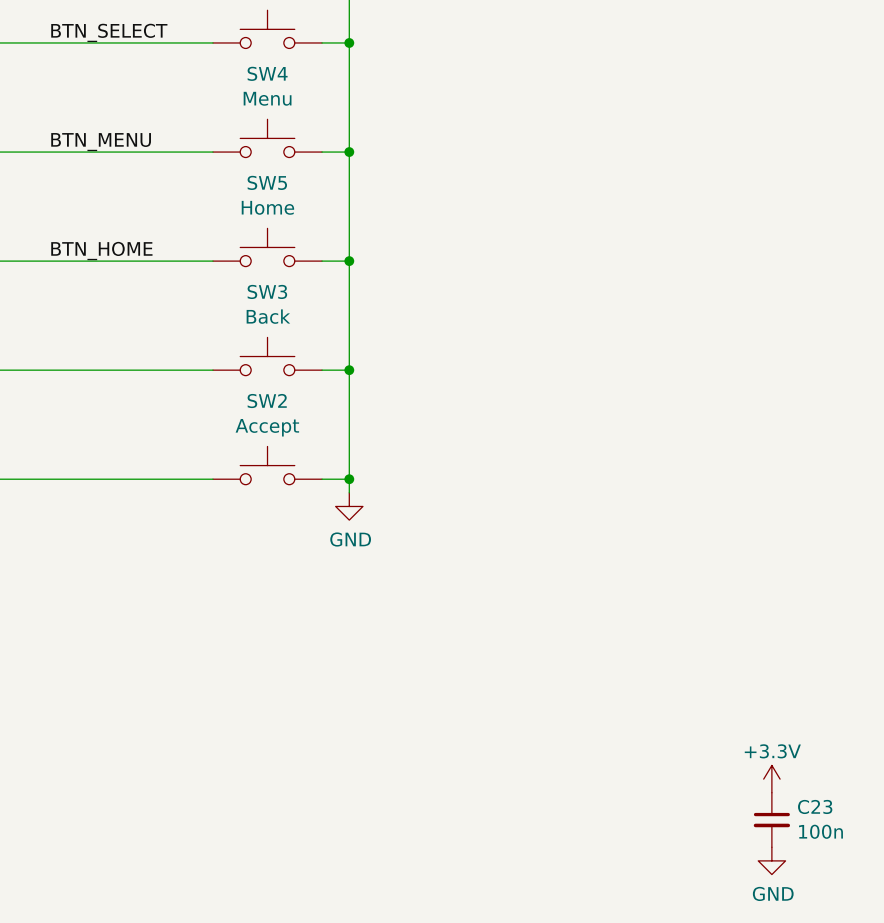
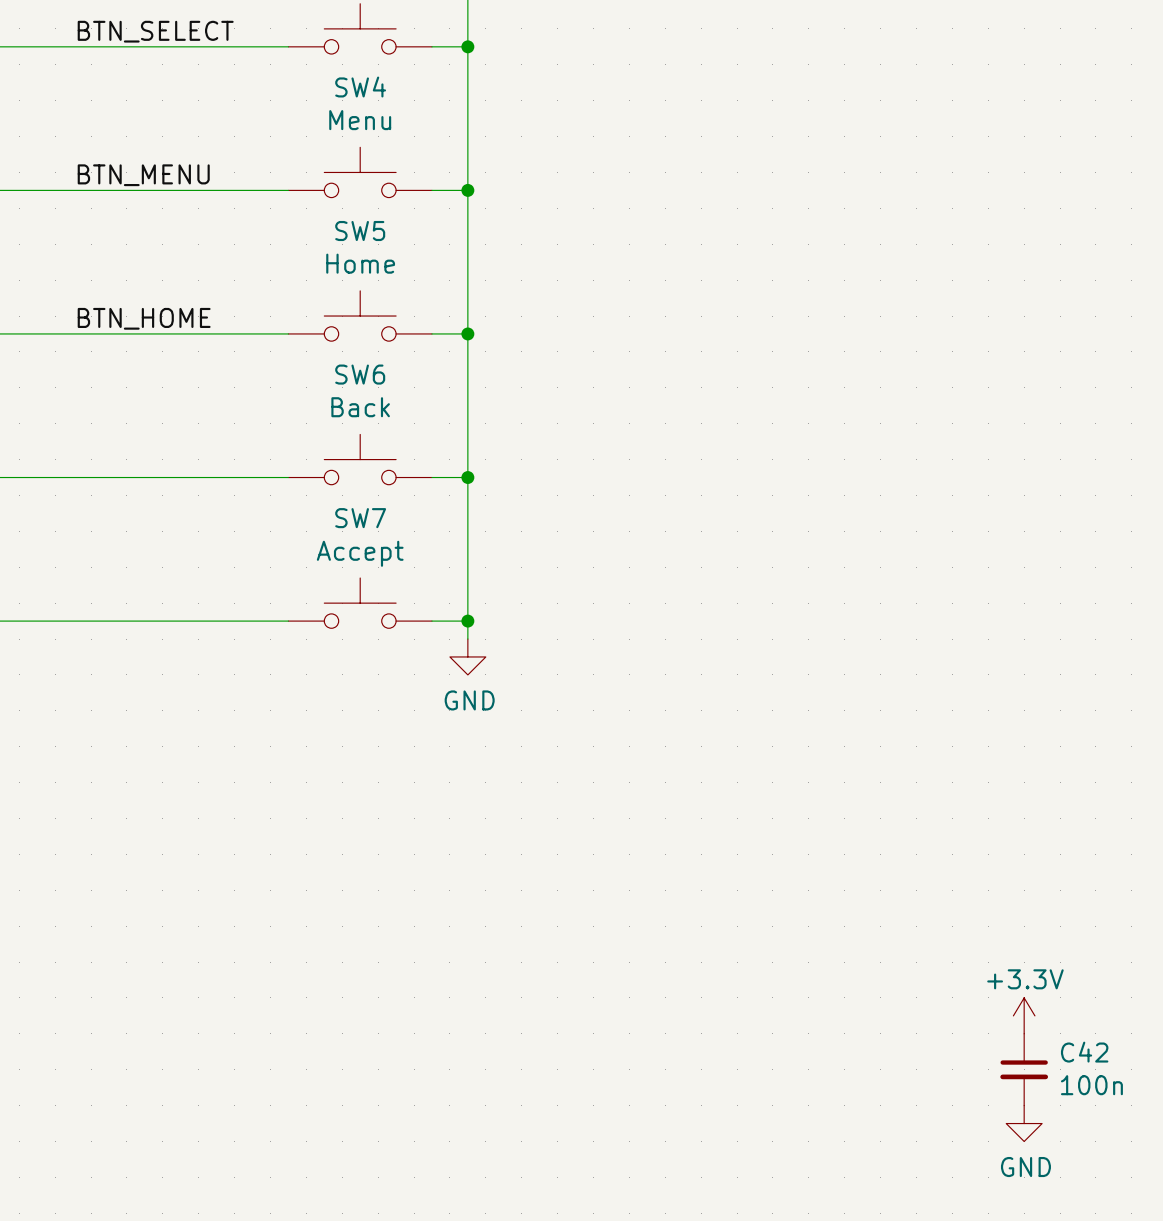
SW3 name: SW3 (267, 291) -> SW6 (360, 374)
SW2 name: SW2 (267, 401) -> SW7 (360, 518)
C23 name: C23 (815, 806) -> C42 (1084, 1052)

